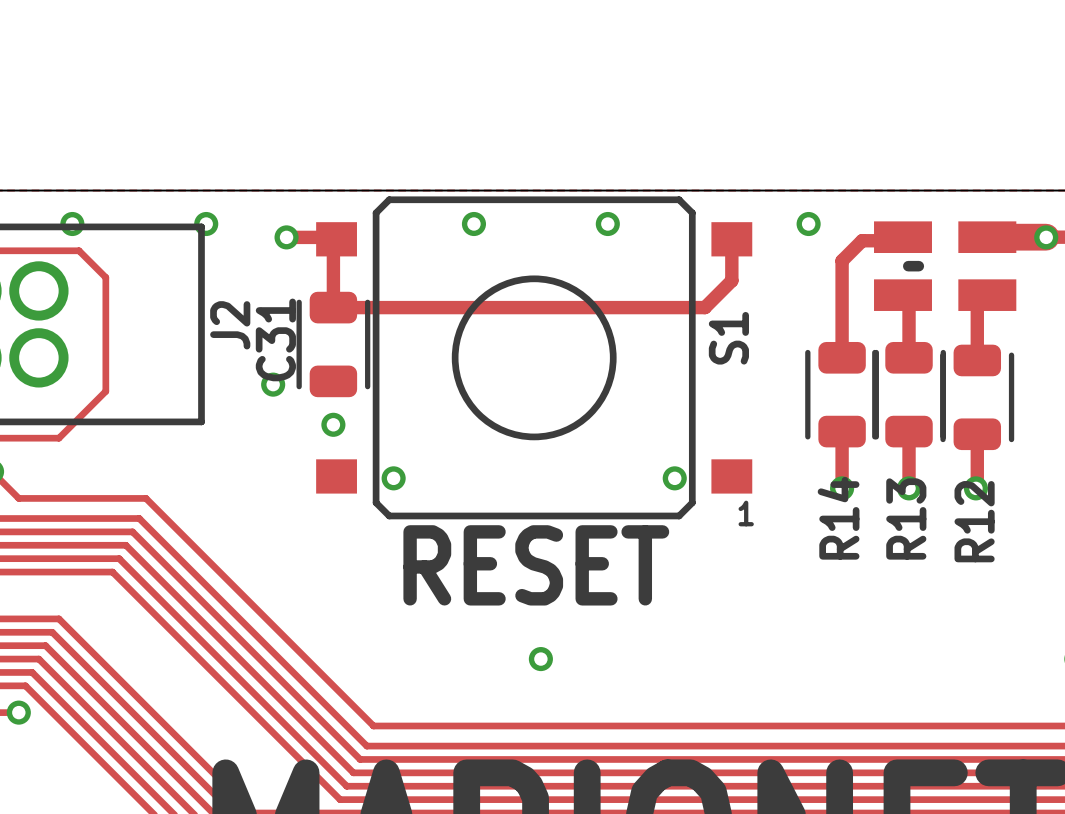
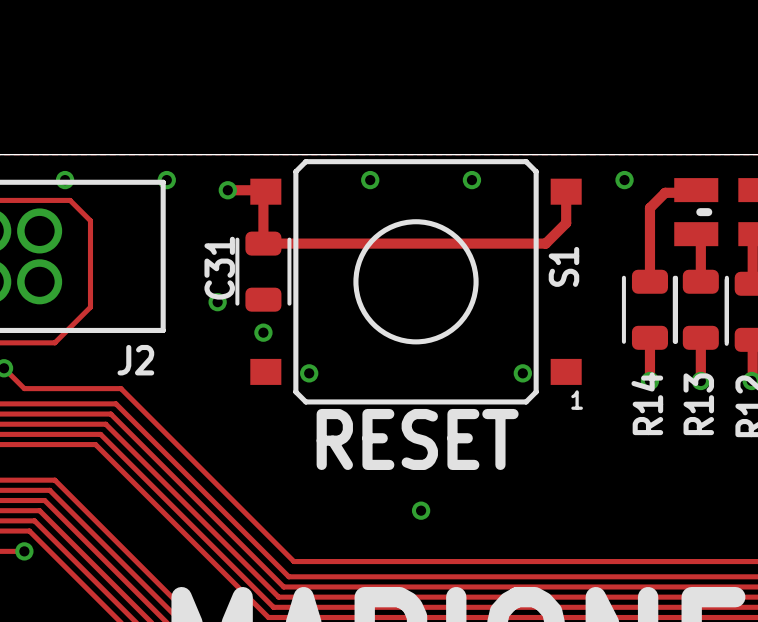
J2 name rotation: 0° (230, 325) -> 90° clockwise (135, 360)
J2 name position: J2 (230, 325) -> J2 (135, 360)

